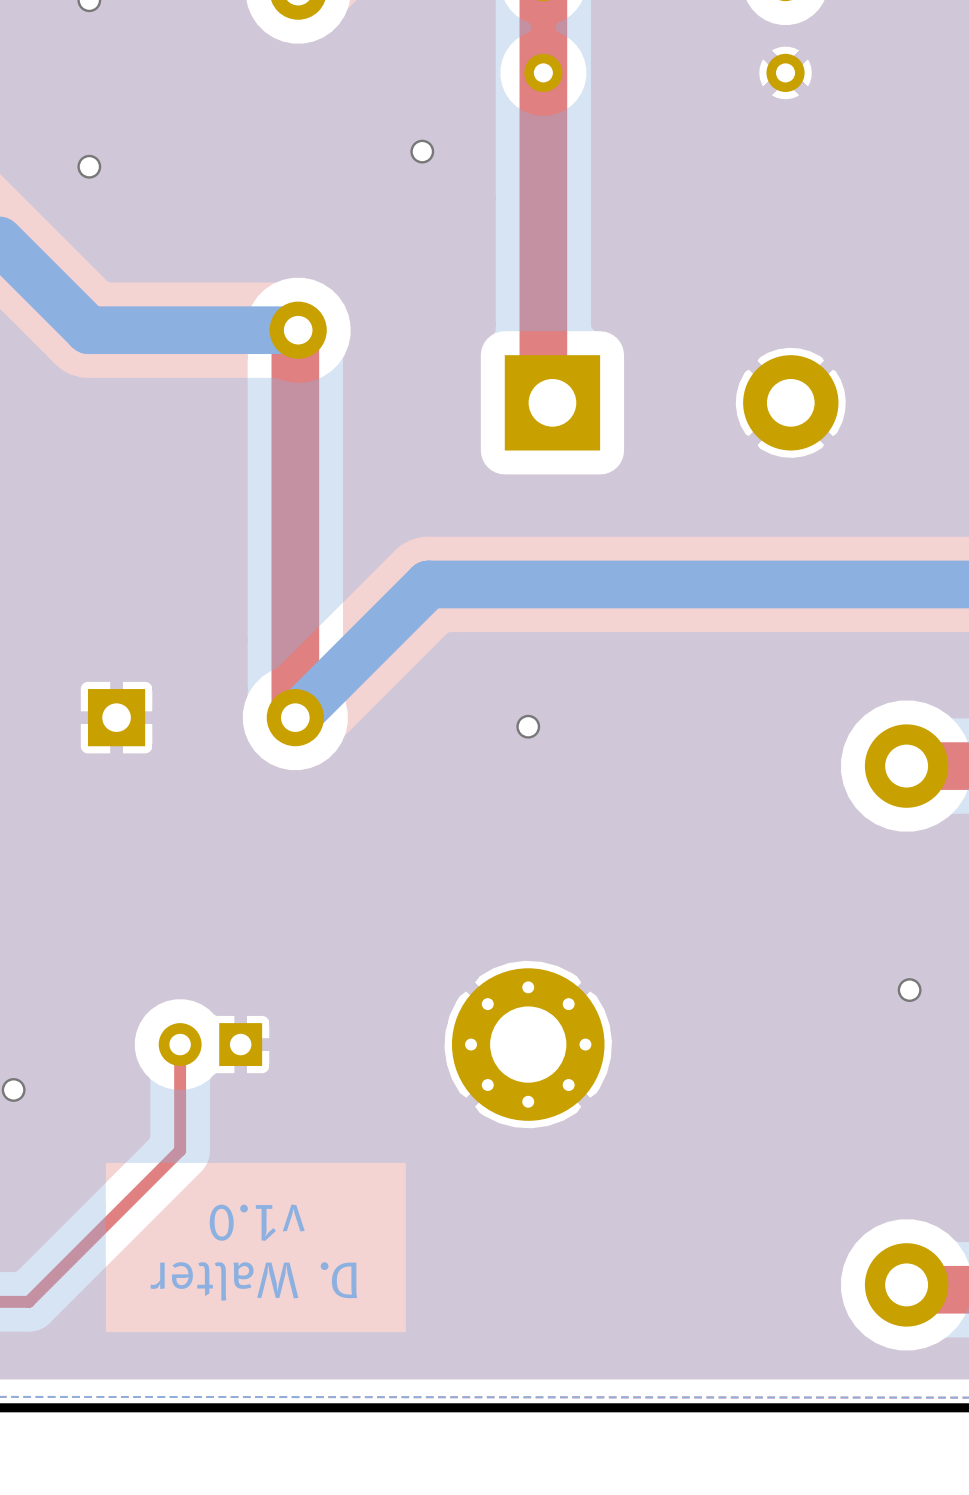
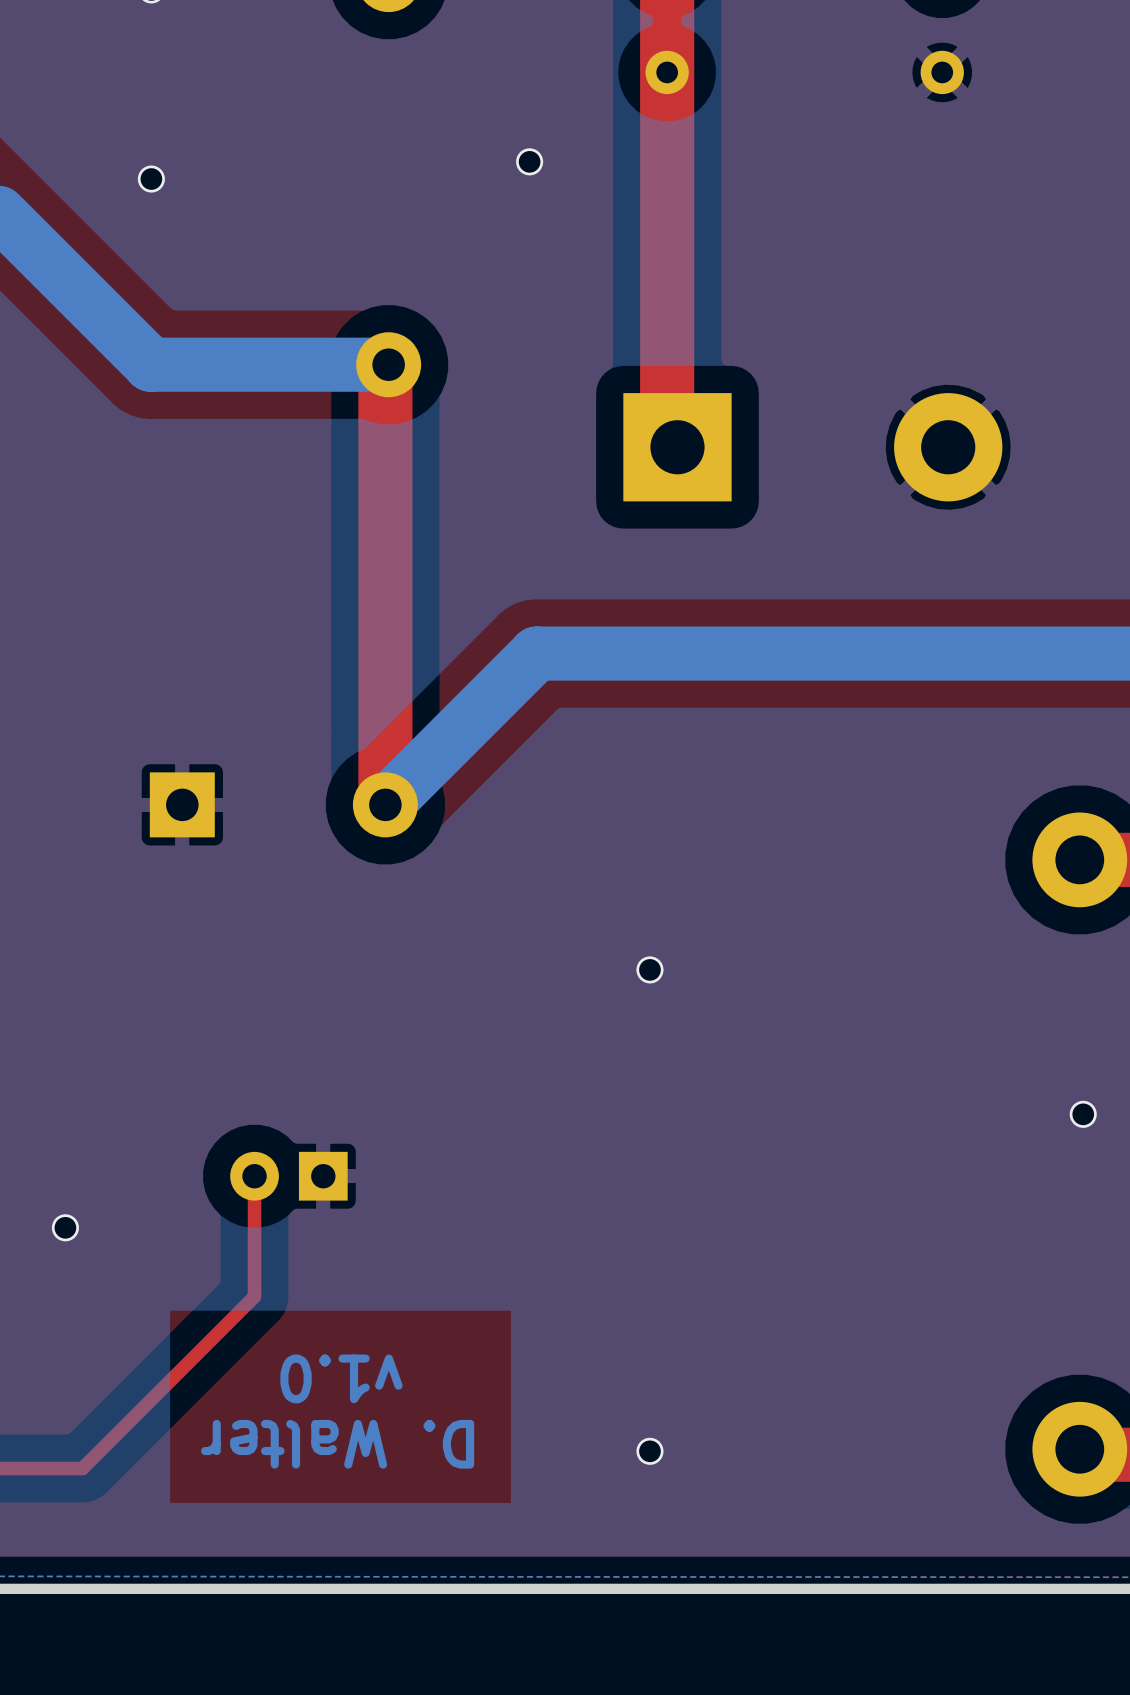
via position: (528, 726) -> (649, 969)
part: (528, 1044) -> none
via: none -> (649, 1451)

